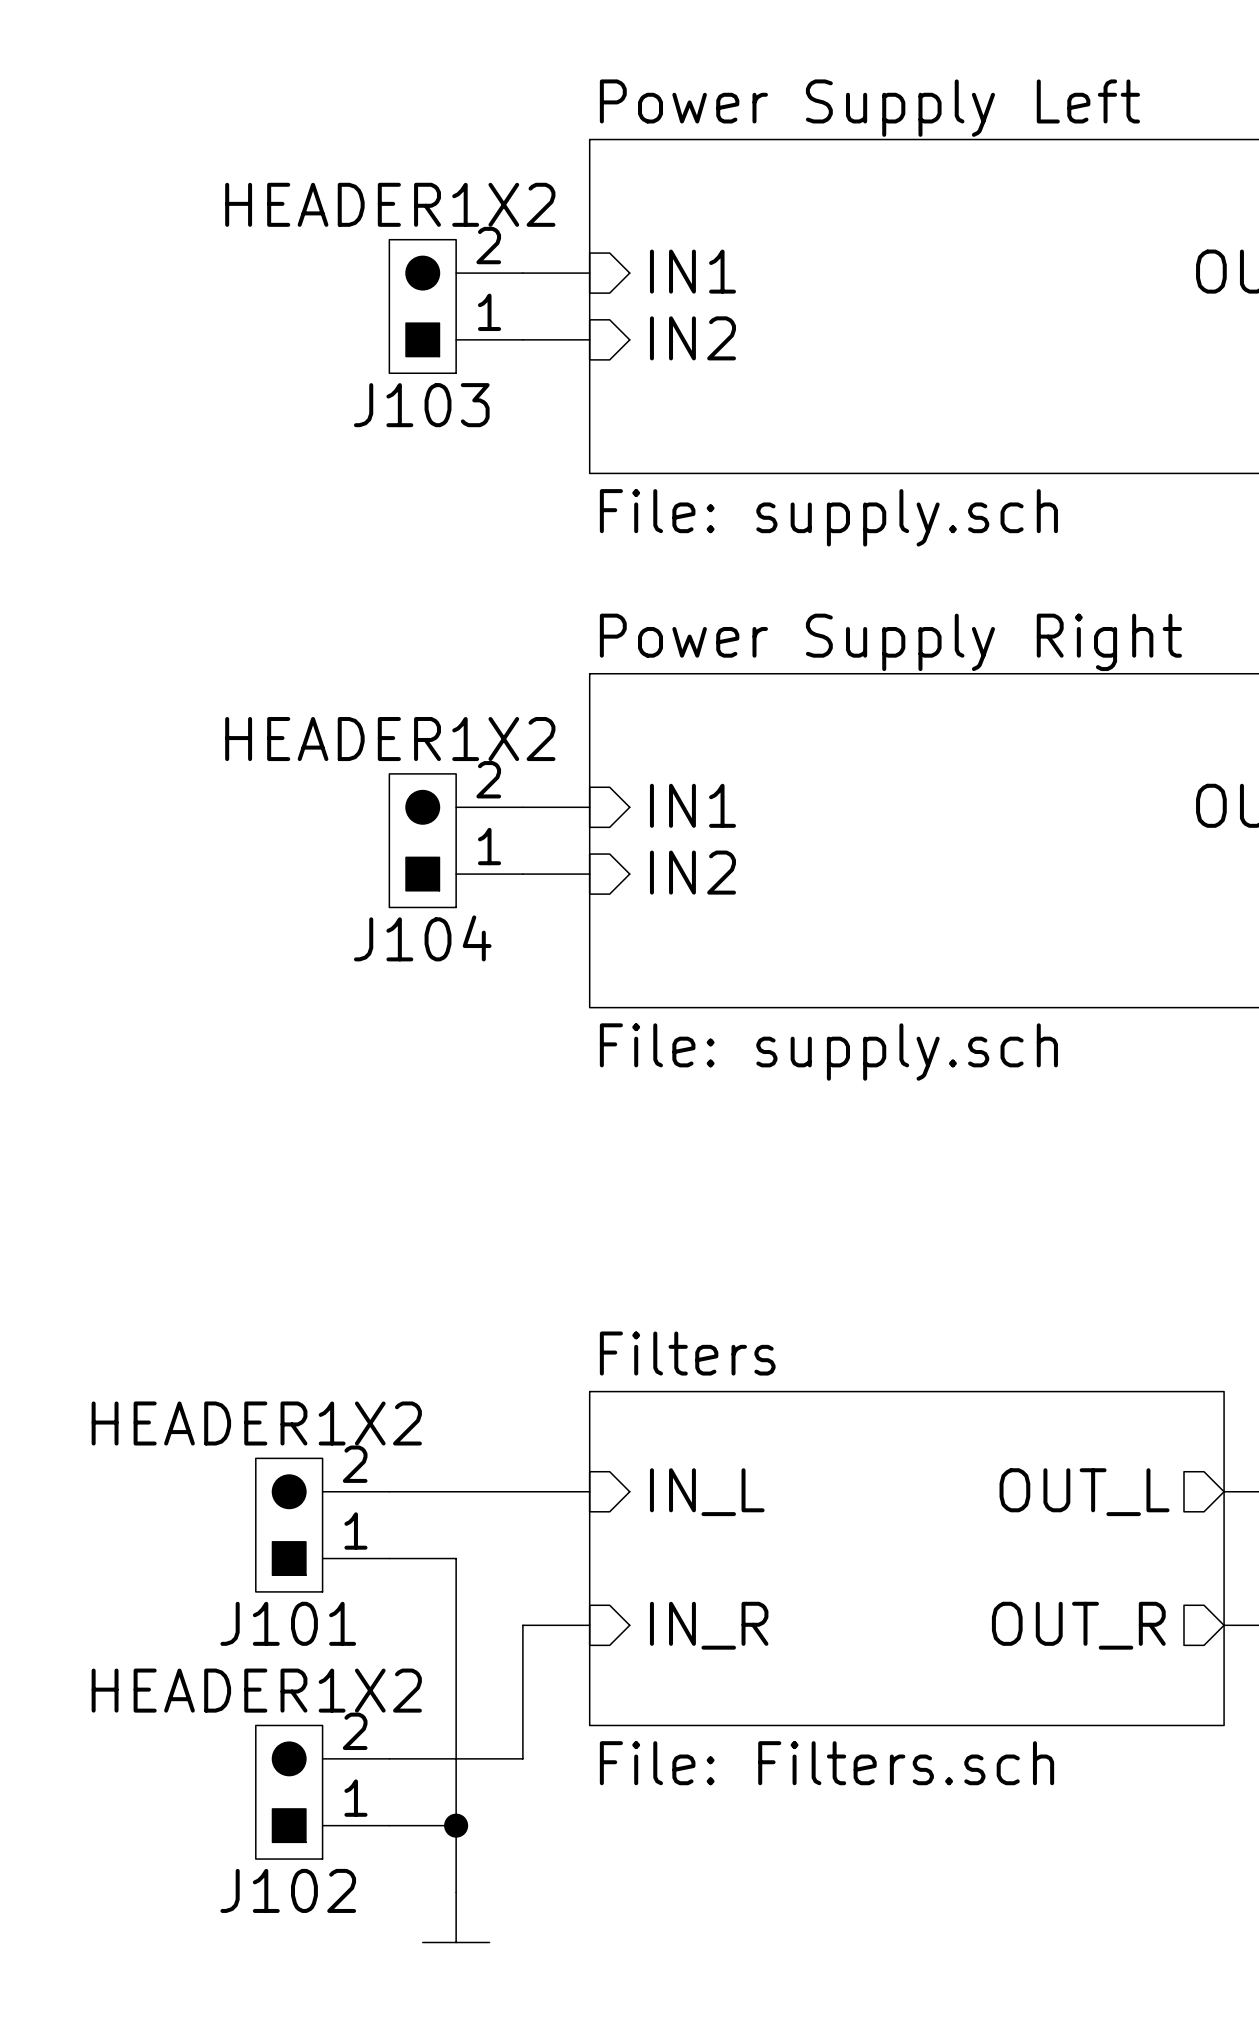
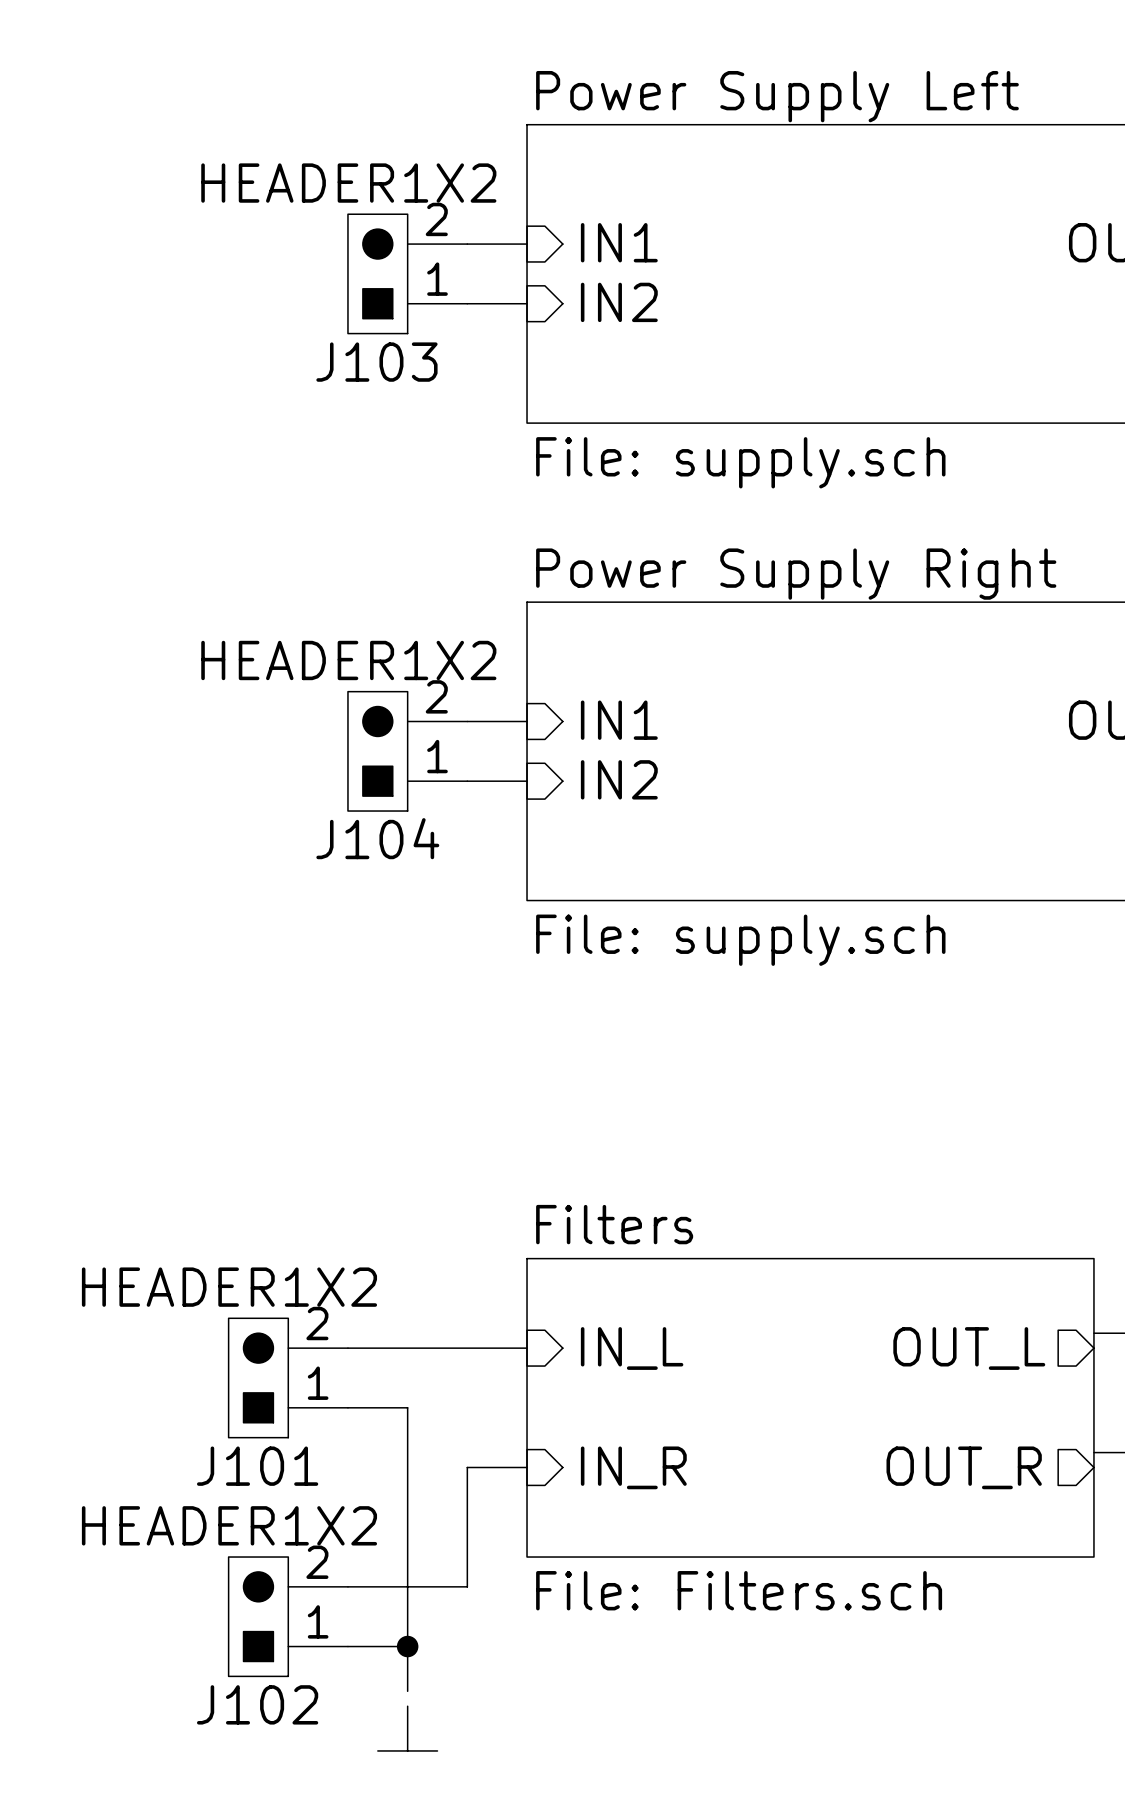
wire: (389, 1491) (589, 1491) -> (347, 1348) (527, 1348)
sheet pin position: IN_L (707, 1492) -> IN_L (632, 1348)
sheet pin position: OUT_L (1084, 1492) -> OUT_L (969, 1348)
J101 position: (322, 1525) -> (288, 1377)
wire: (389, 1558) (456, 1558) (456, 1575) -> (347, 1407) (407, 1407)
sheet Filters position: (906, 1558) -> (810, 1407)
wire: (589, 1625) (522, 1625) (522, 1642) -> (527, 1467) (467, 1467)
sheet pin position: IN_R (709, 1625) -> IN_R (633, 1467)
sheet pin position: OUT_R (1078, 1625) -> OUT_R (964, 1467)
wire: (389, 1758) (522, 1758) -> (347, 1586) (467, 1586) (467, 1571)
J102 position: (322, 1792) -> (288, 1616)
wire: (389, 1825) (456, 1825) -> (347, 1646) (407, 1646)
junction position: (456, 1825) -> (407, 1646)
power symbol position: (456, 1917) -> (407, 1728)

